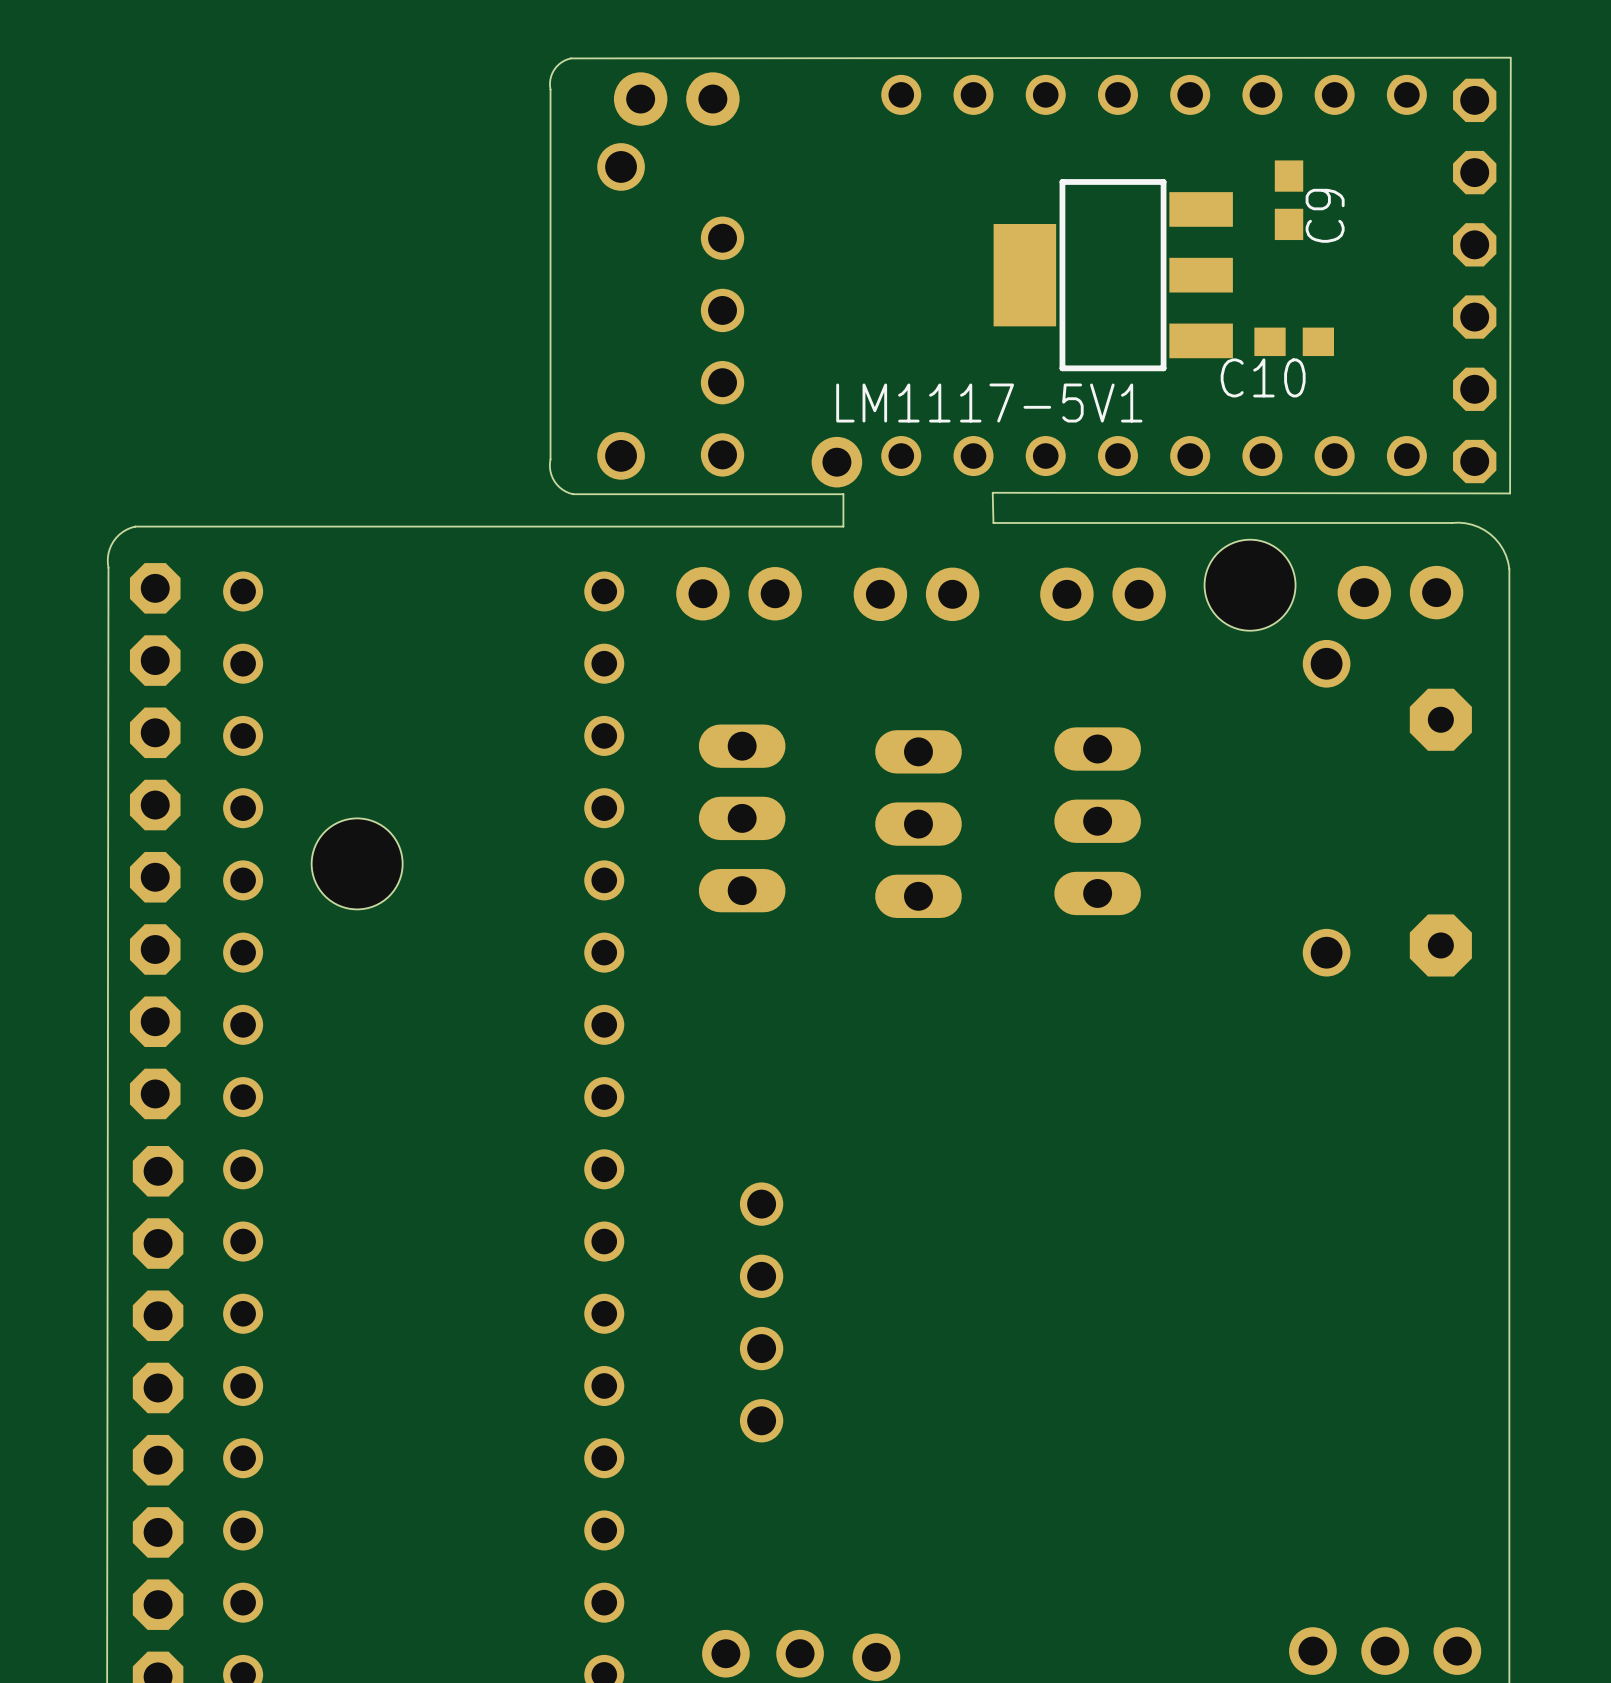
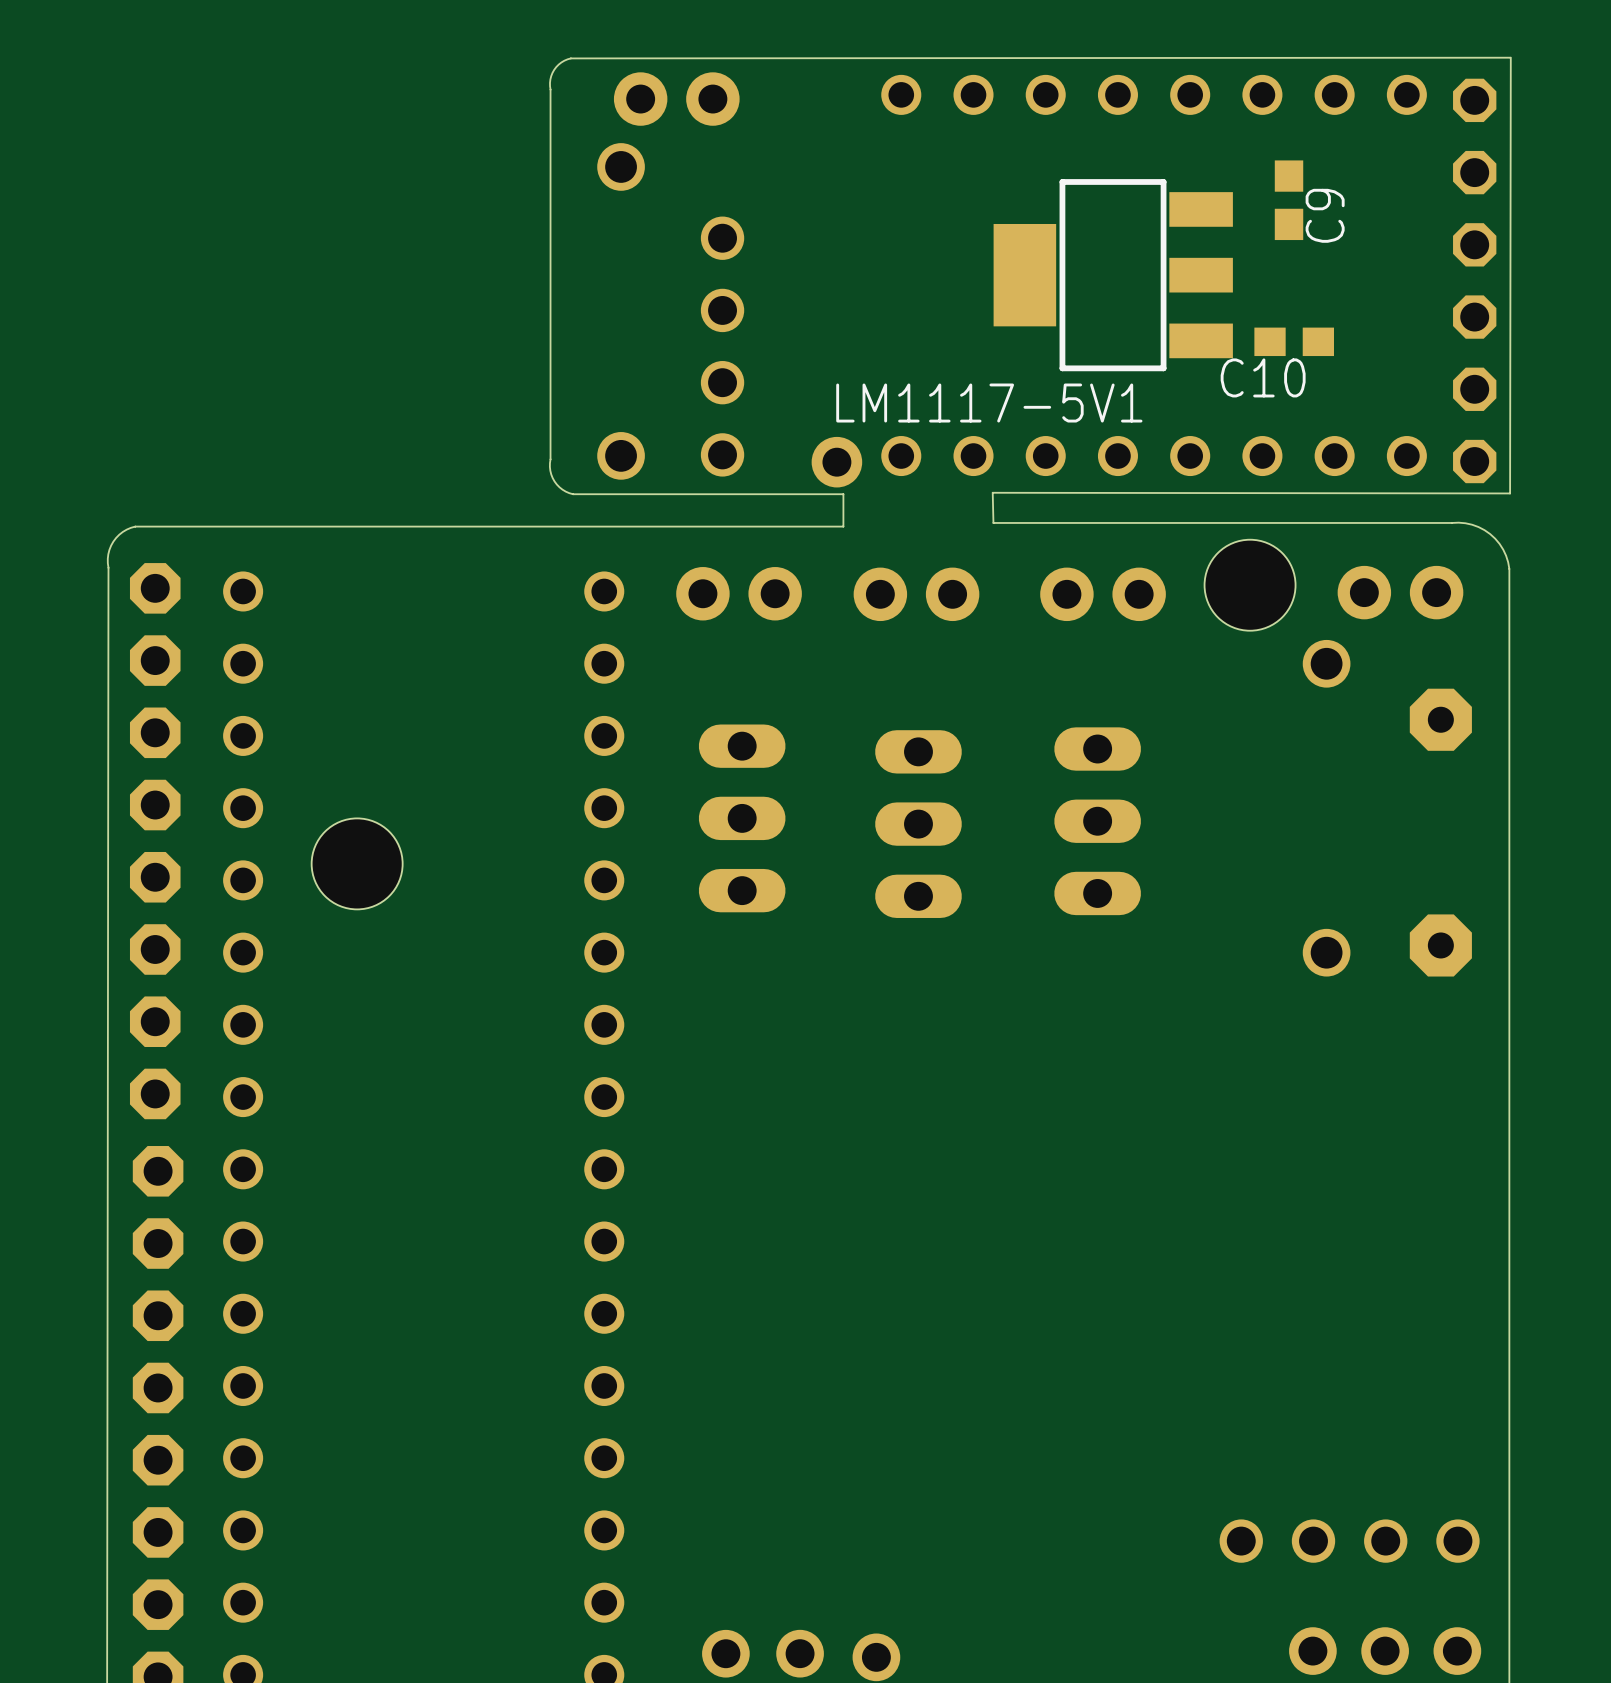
part rotation: 0° (761, 1312) -> 90° clockwise (1349, 1541)
part position: (761, 1312) -> (1349, 1541)

